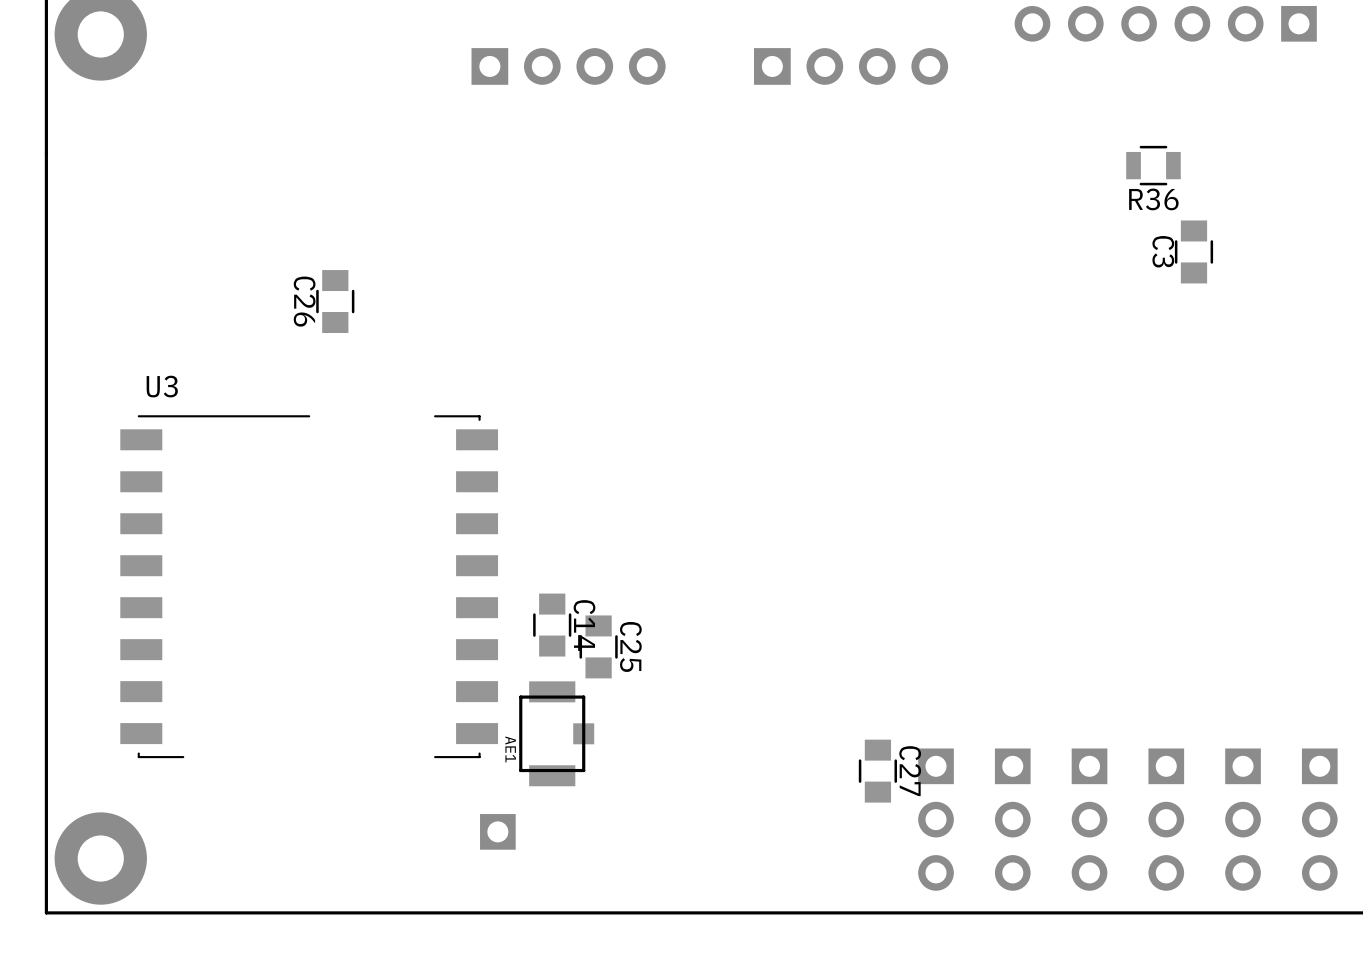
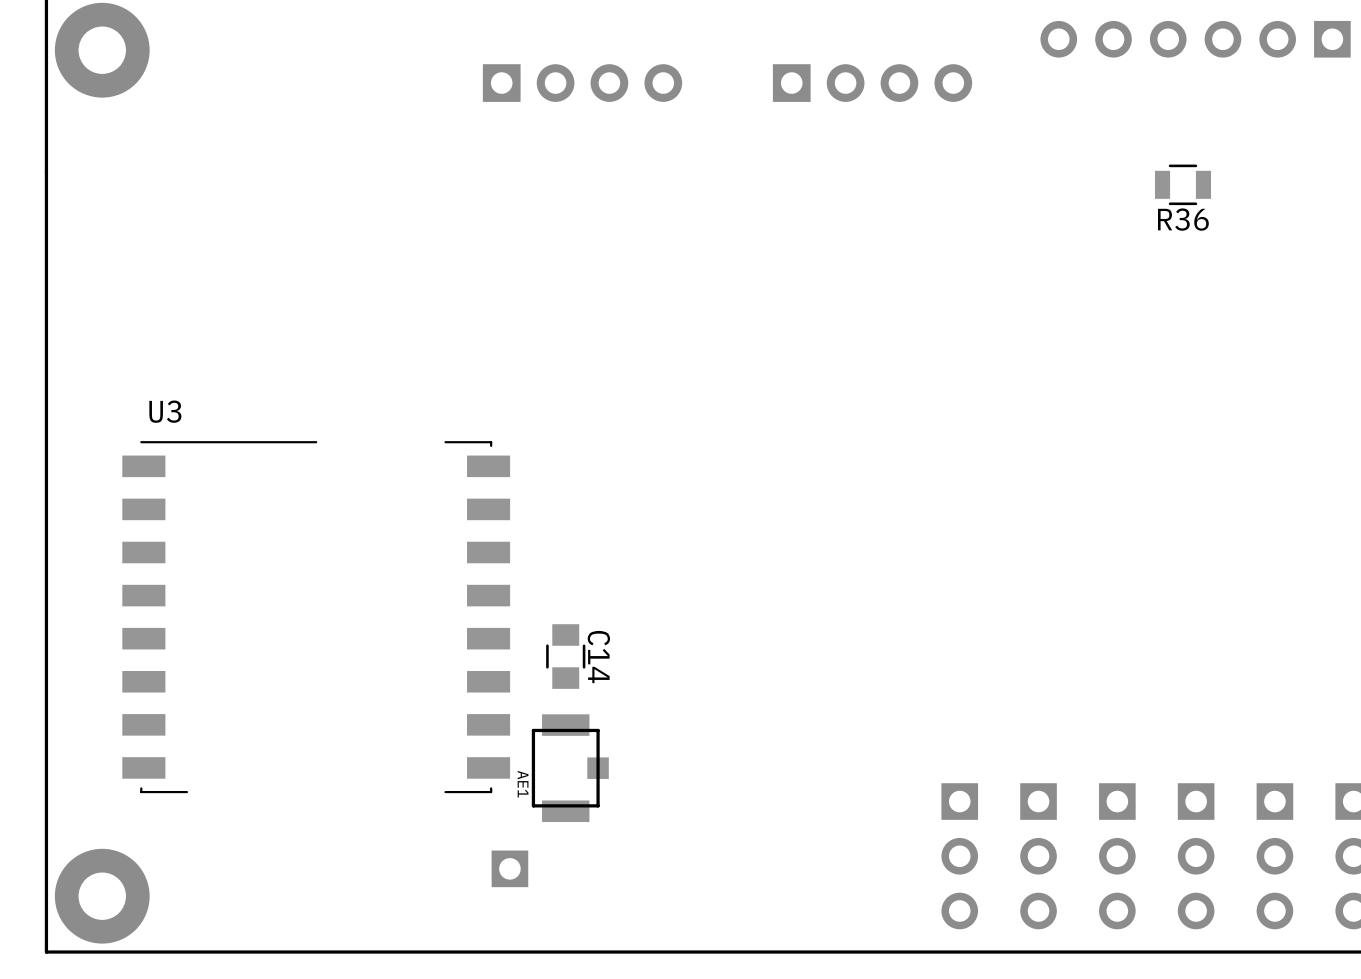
C3: (1193, 251) -> none
C26: (335, 301) -> none
C25: (598, 646) -> none
C27: (877, 771) -> none

